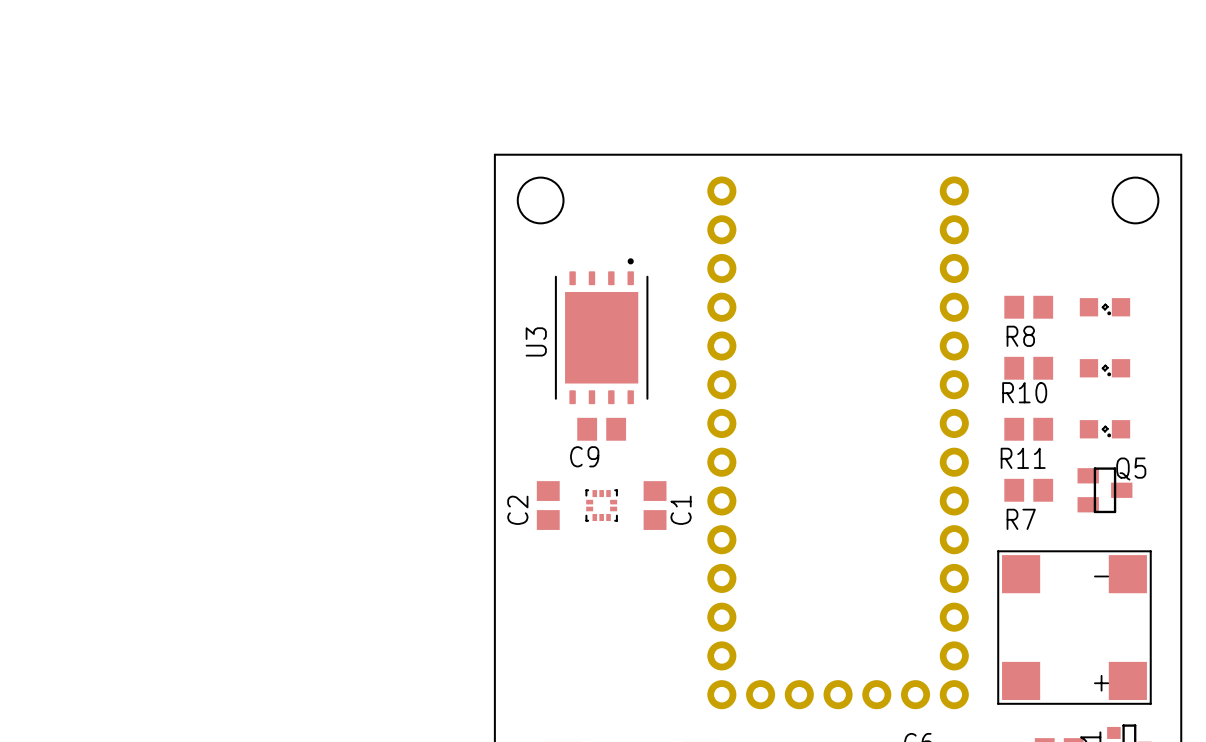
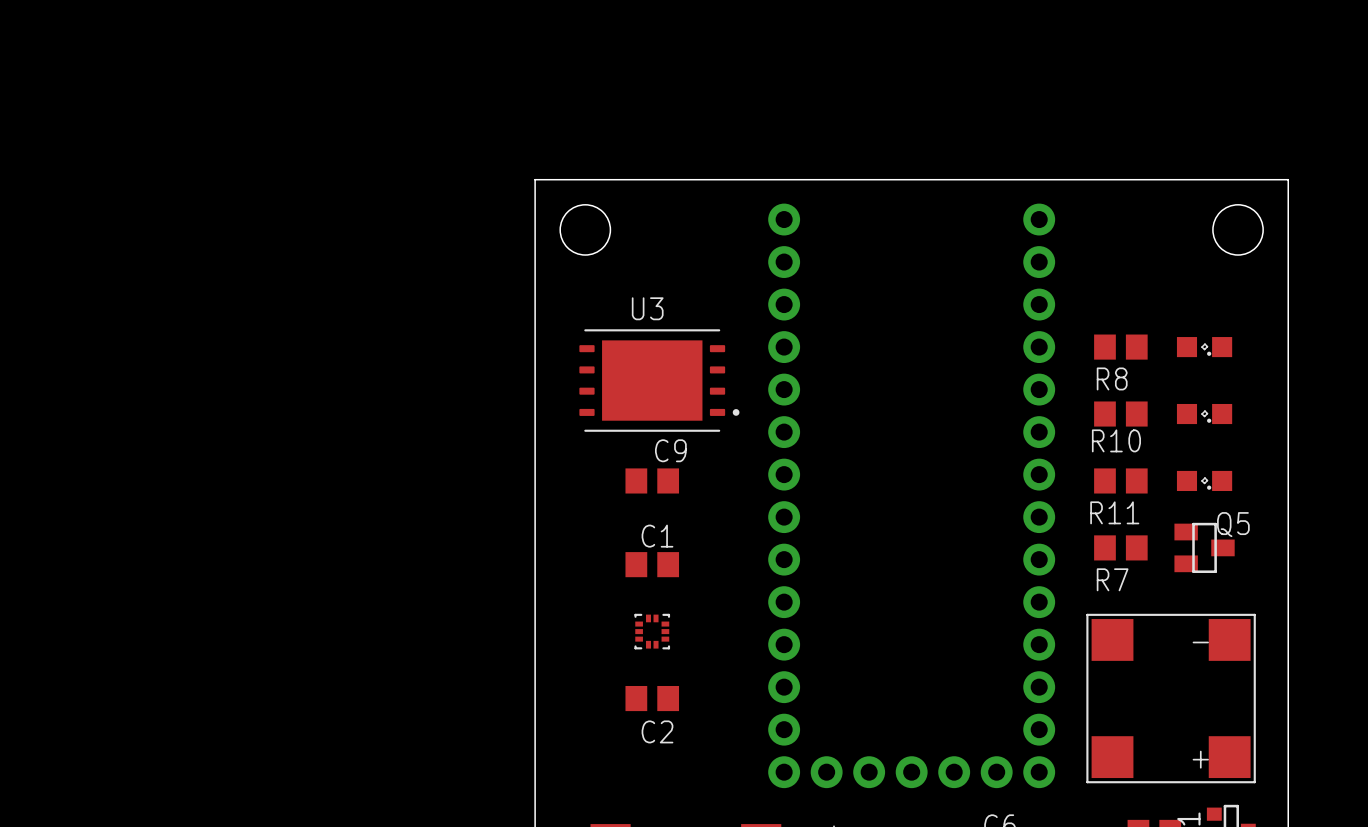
U3 rotation: 0° (601, 331) -> 90° clockwise (659, 380)
C9 name position: C9 (584, 456) -> C9 (670, 450)
C2 rotation: 0° (548, 505) -> 90° clockwise (652, 698)
C2 position: (548, 505) -> (652, 698)
part rotation: 0° (601, 505) -> 90° clockwise (652, 631)
part position: (601, 505) -> (652, 631)
C1 rotation: 0° (655, 505) -> 90° clockwise (652, 564)
C1 position: (655, 505) -> (652, 564)
C2 name position: C2 (517, 510) -> C2 (657, 731)
C1 name position: C1 (681, 510) -> C1 (657, 536)

